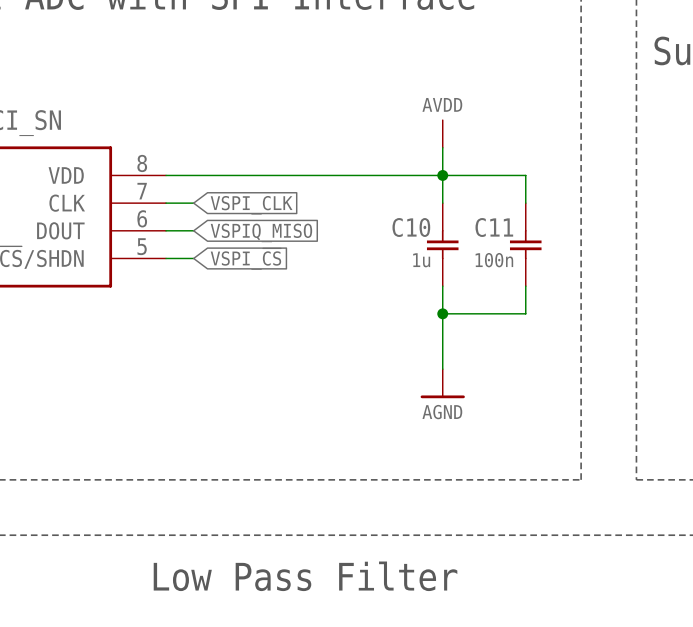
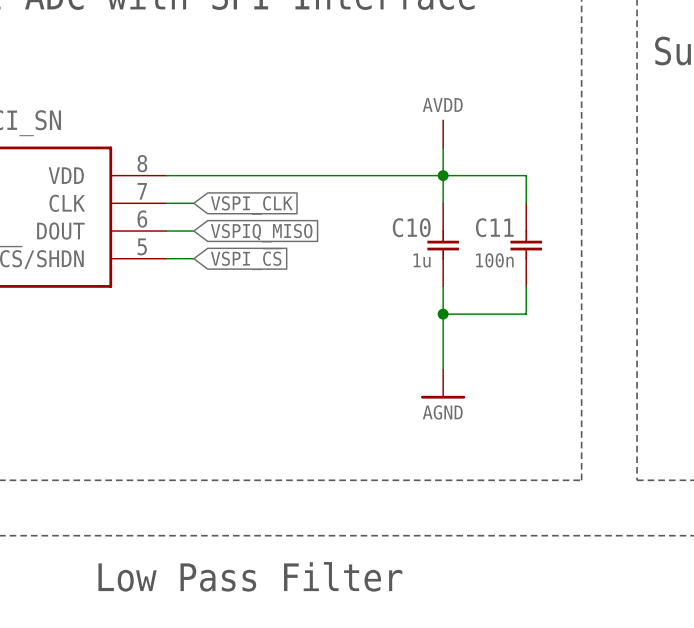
text position: Low Pass Filter (305, 576) -> Low Pass Filter (250, 576)

